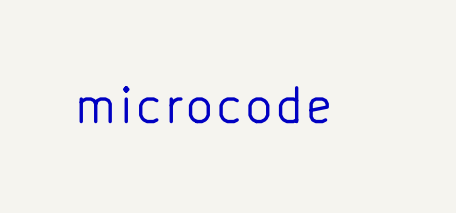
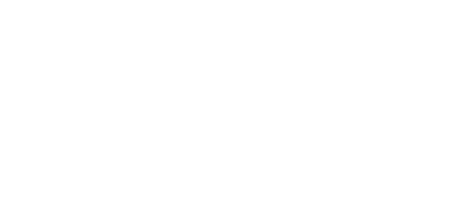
text: microcode (204, 104) -> none

